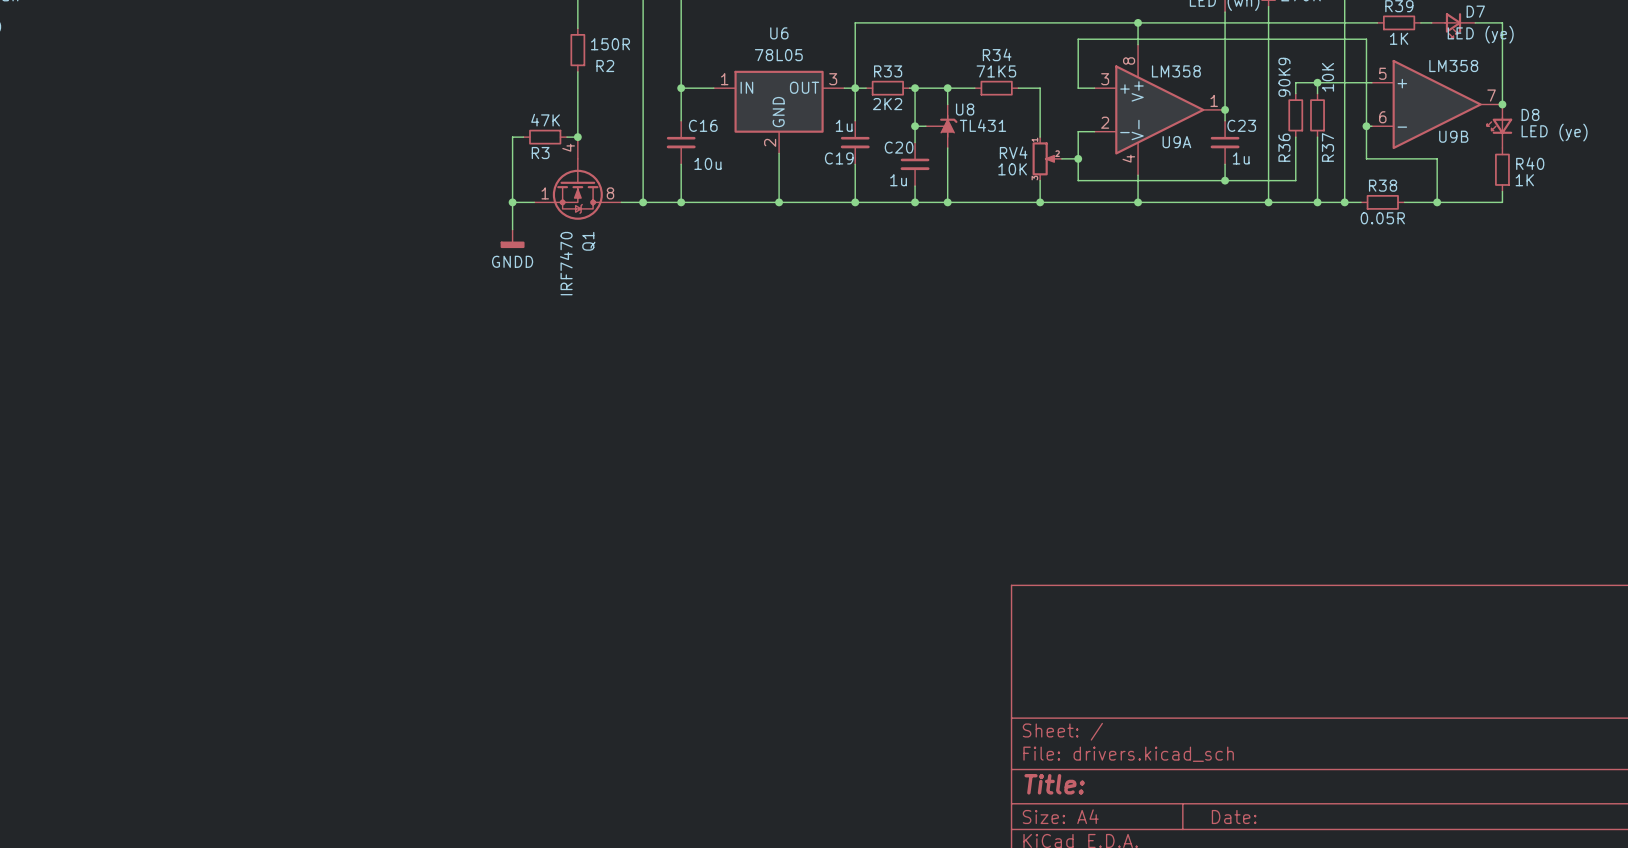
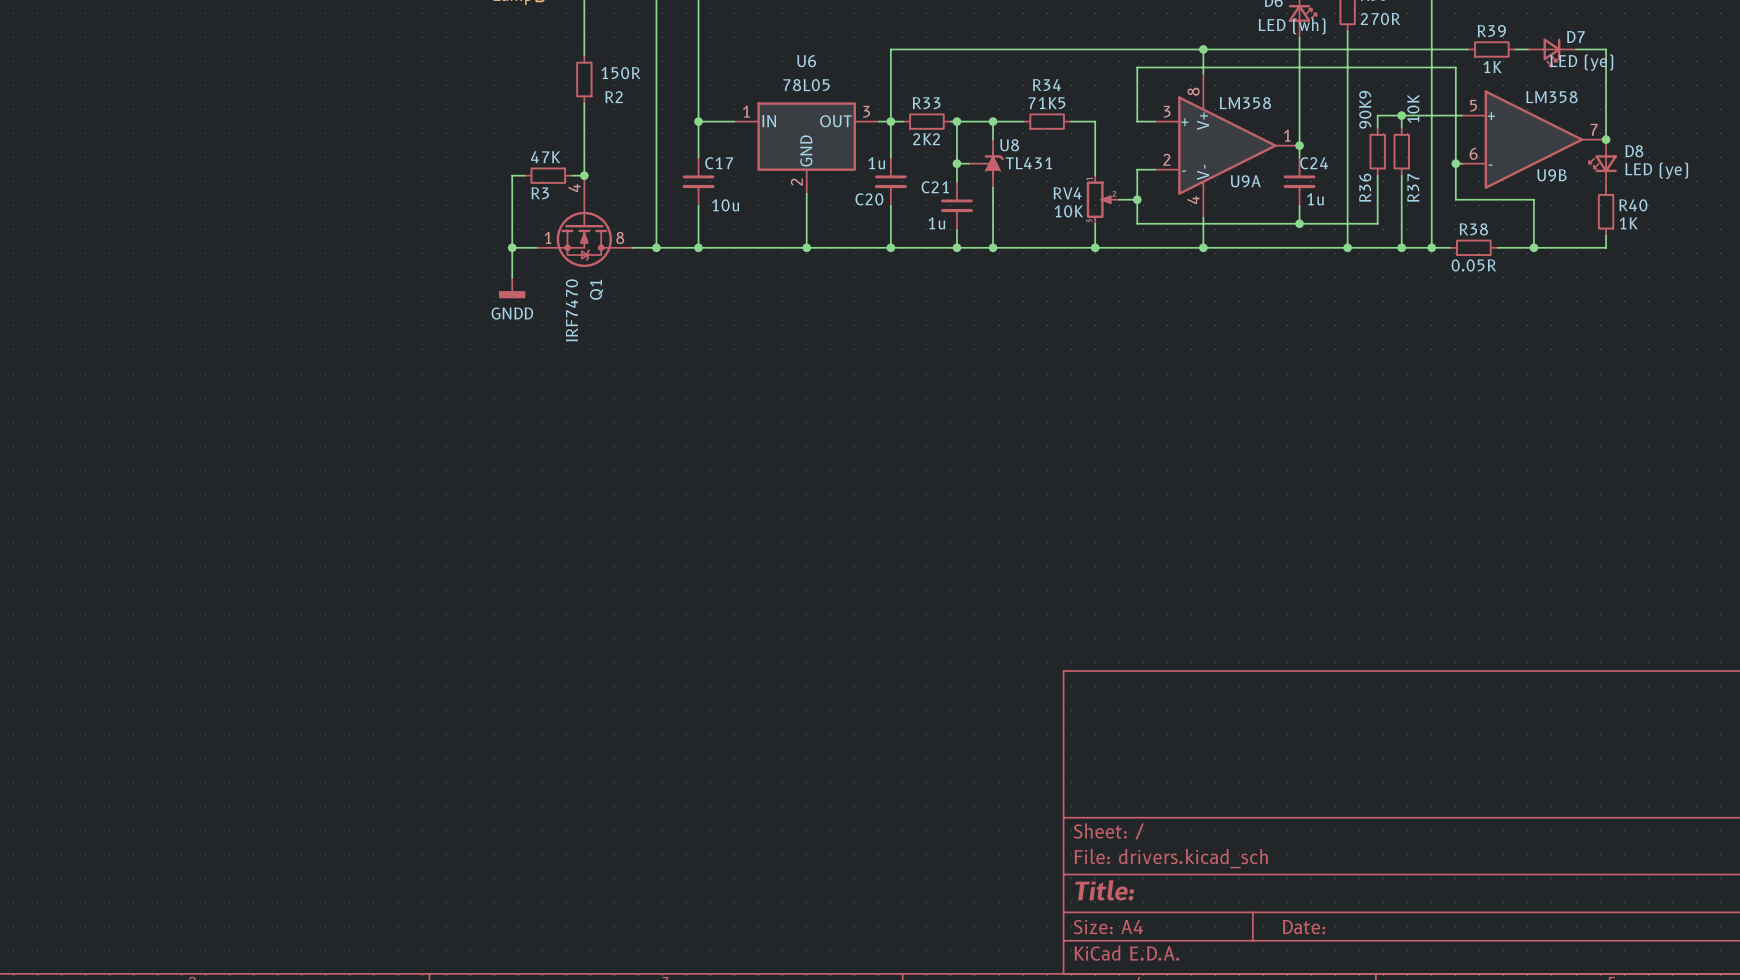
C16 name: C16 (703, 125) -> C17 (719, 163)
C23 name: C23 (1241, 125) -> C24 (1314, 163)
C20 name: C20 (899, 147) -> C21 (935, 187)
C19 name: C19 (839, 158) -> C20 (869, 199)

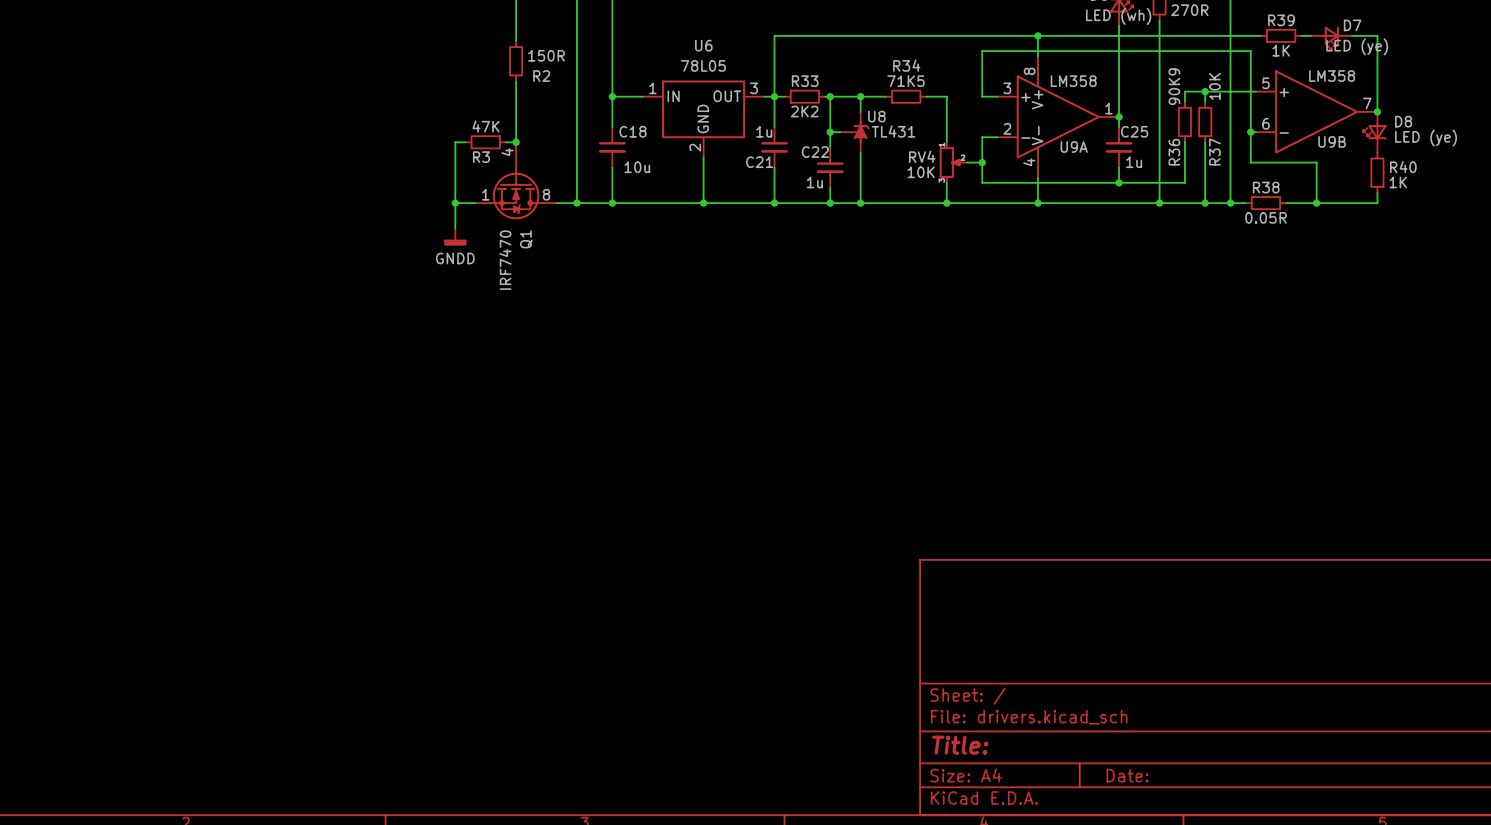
C17 name: C17 (719, 163) -> C18 (632, 131)
C24 name: C24 (1314, 163) -> C25 (1134, 131)
C21 name: C21 (935, 187) -> C22 (815, 152)
C20 name: C20 (869, 199) -> C21 (759, 162)

